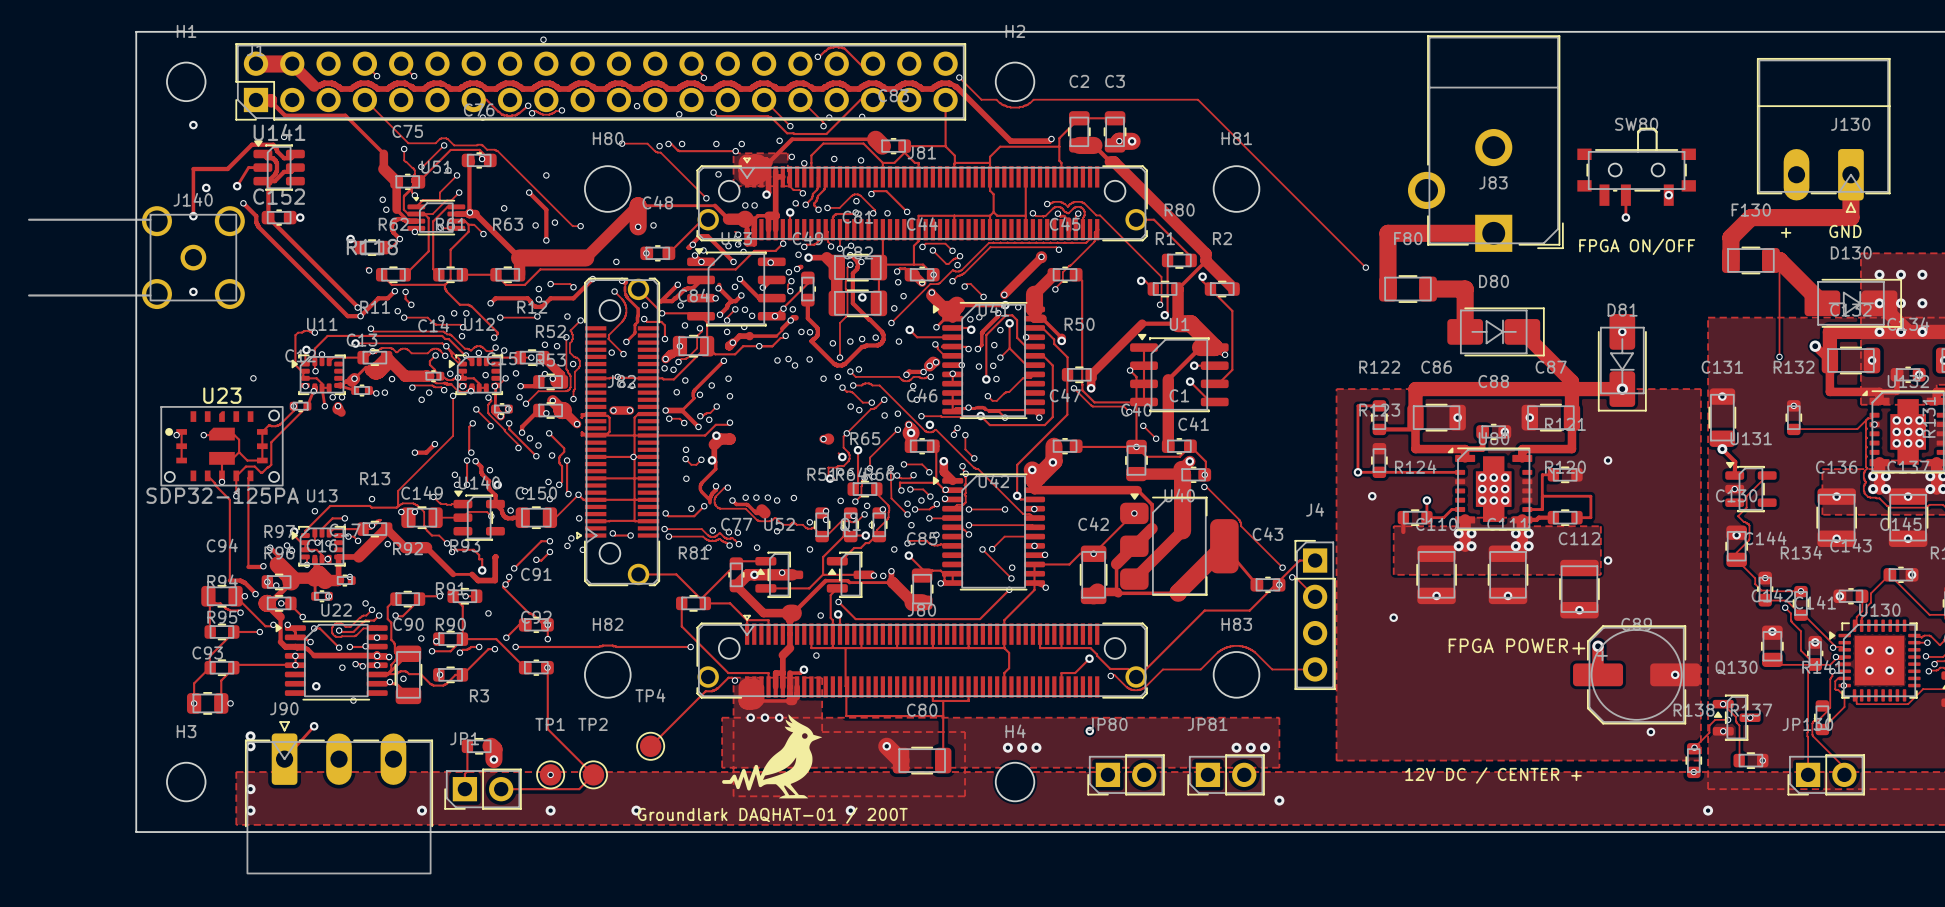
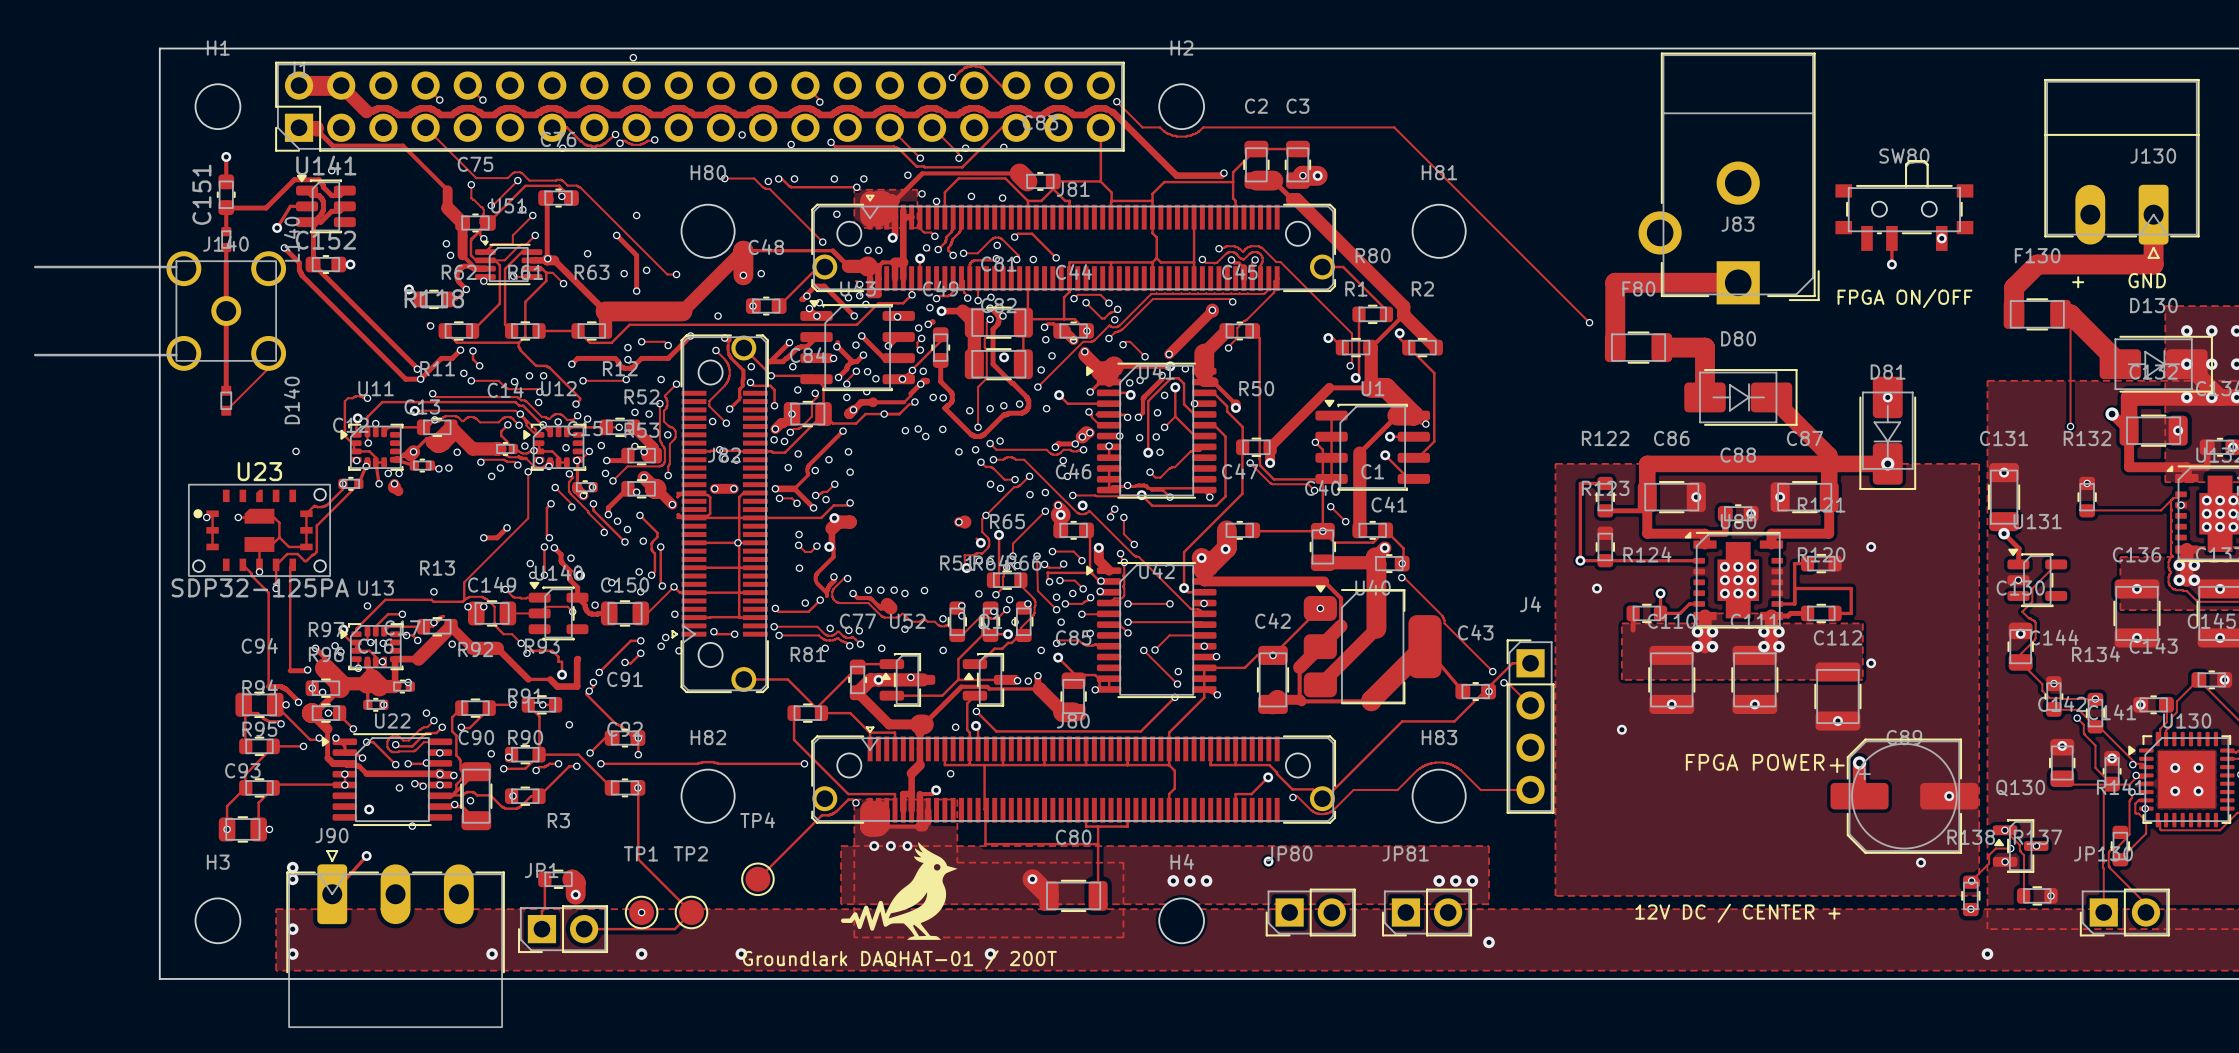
track: none -> (226, 156) (226, 181)
C151: none -> (226, 194)
via: (206, 187) -> none
track: (193, 189) (193, 203) -> none
L140: none -> (226, 239)
track: none -> (226, 262) (226, 390)
via: (193, 216) -> none
via: (193, 291) -> none
track: none -> (268, 368) (226, 410)
D140: none -> (226, 400)

